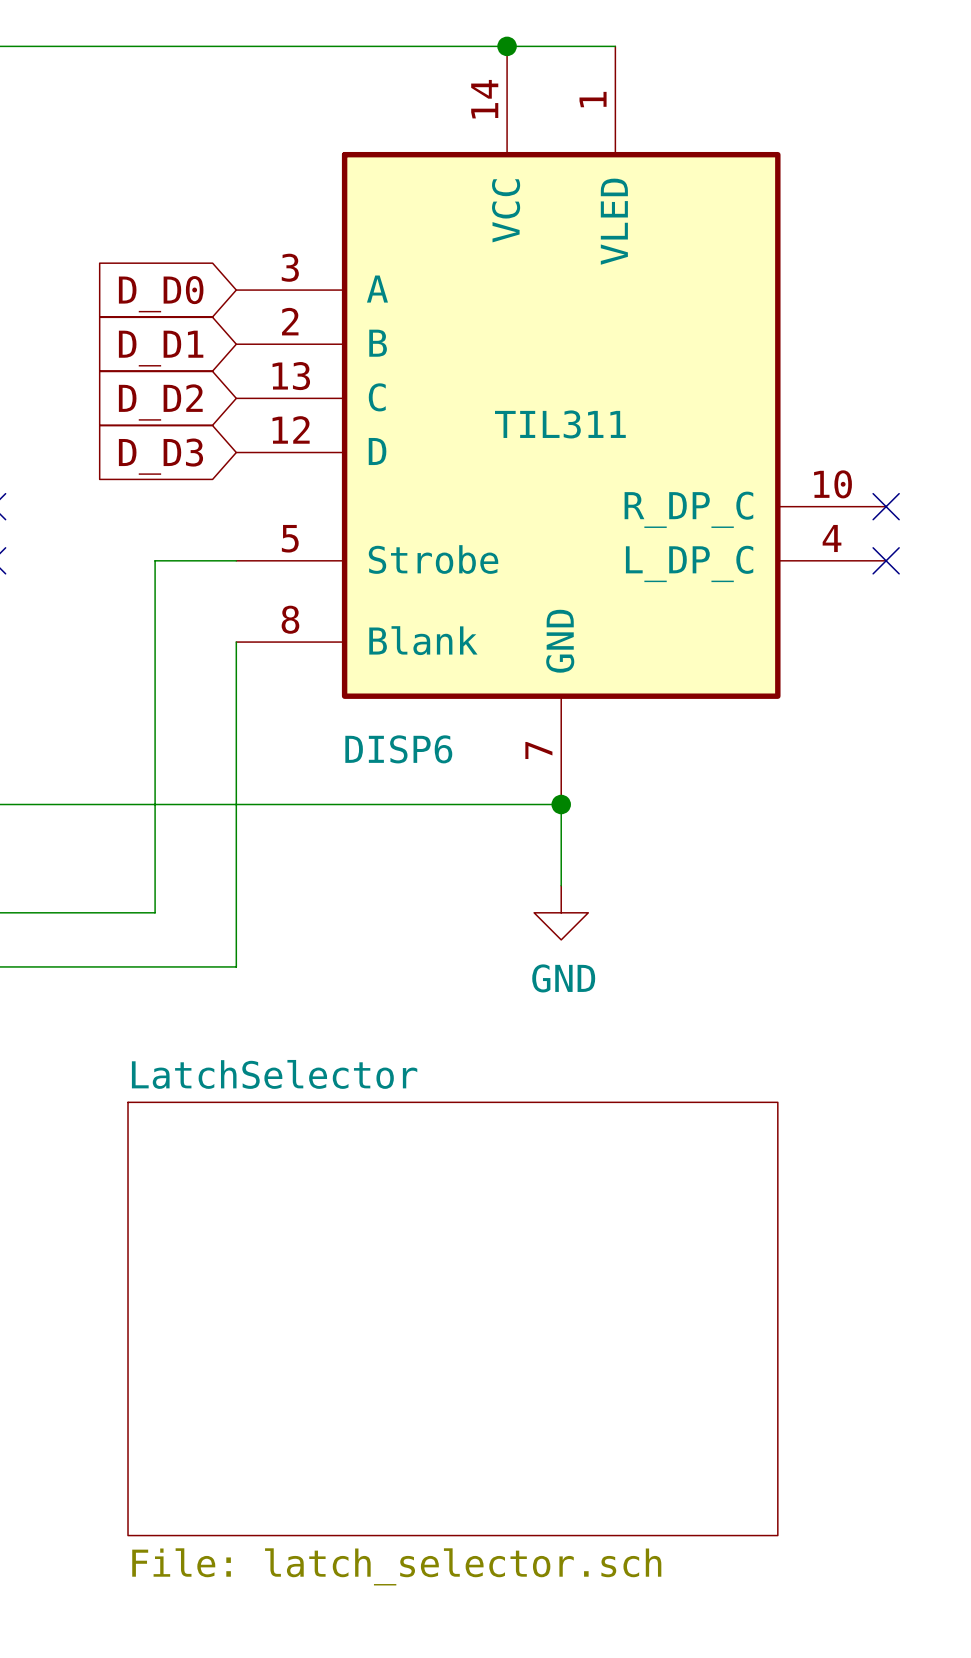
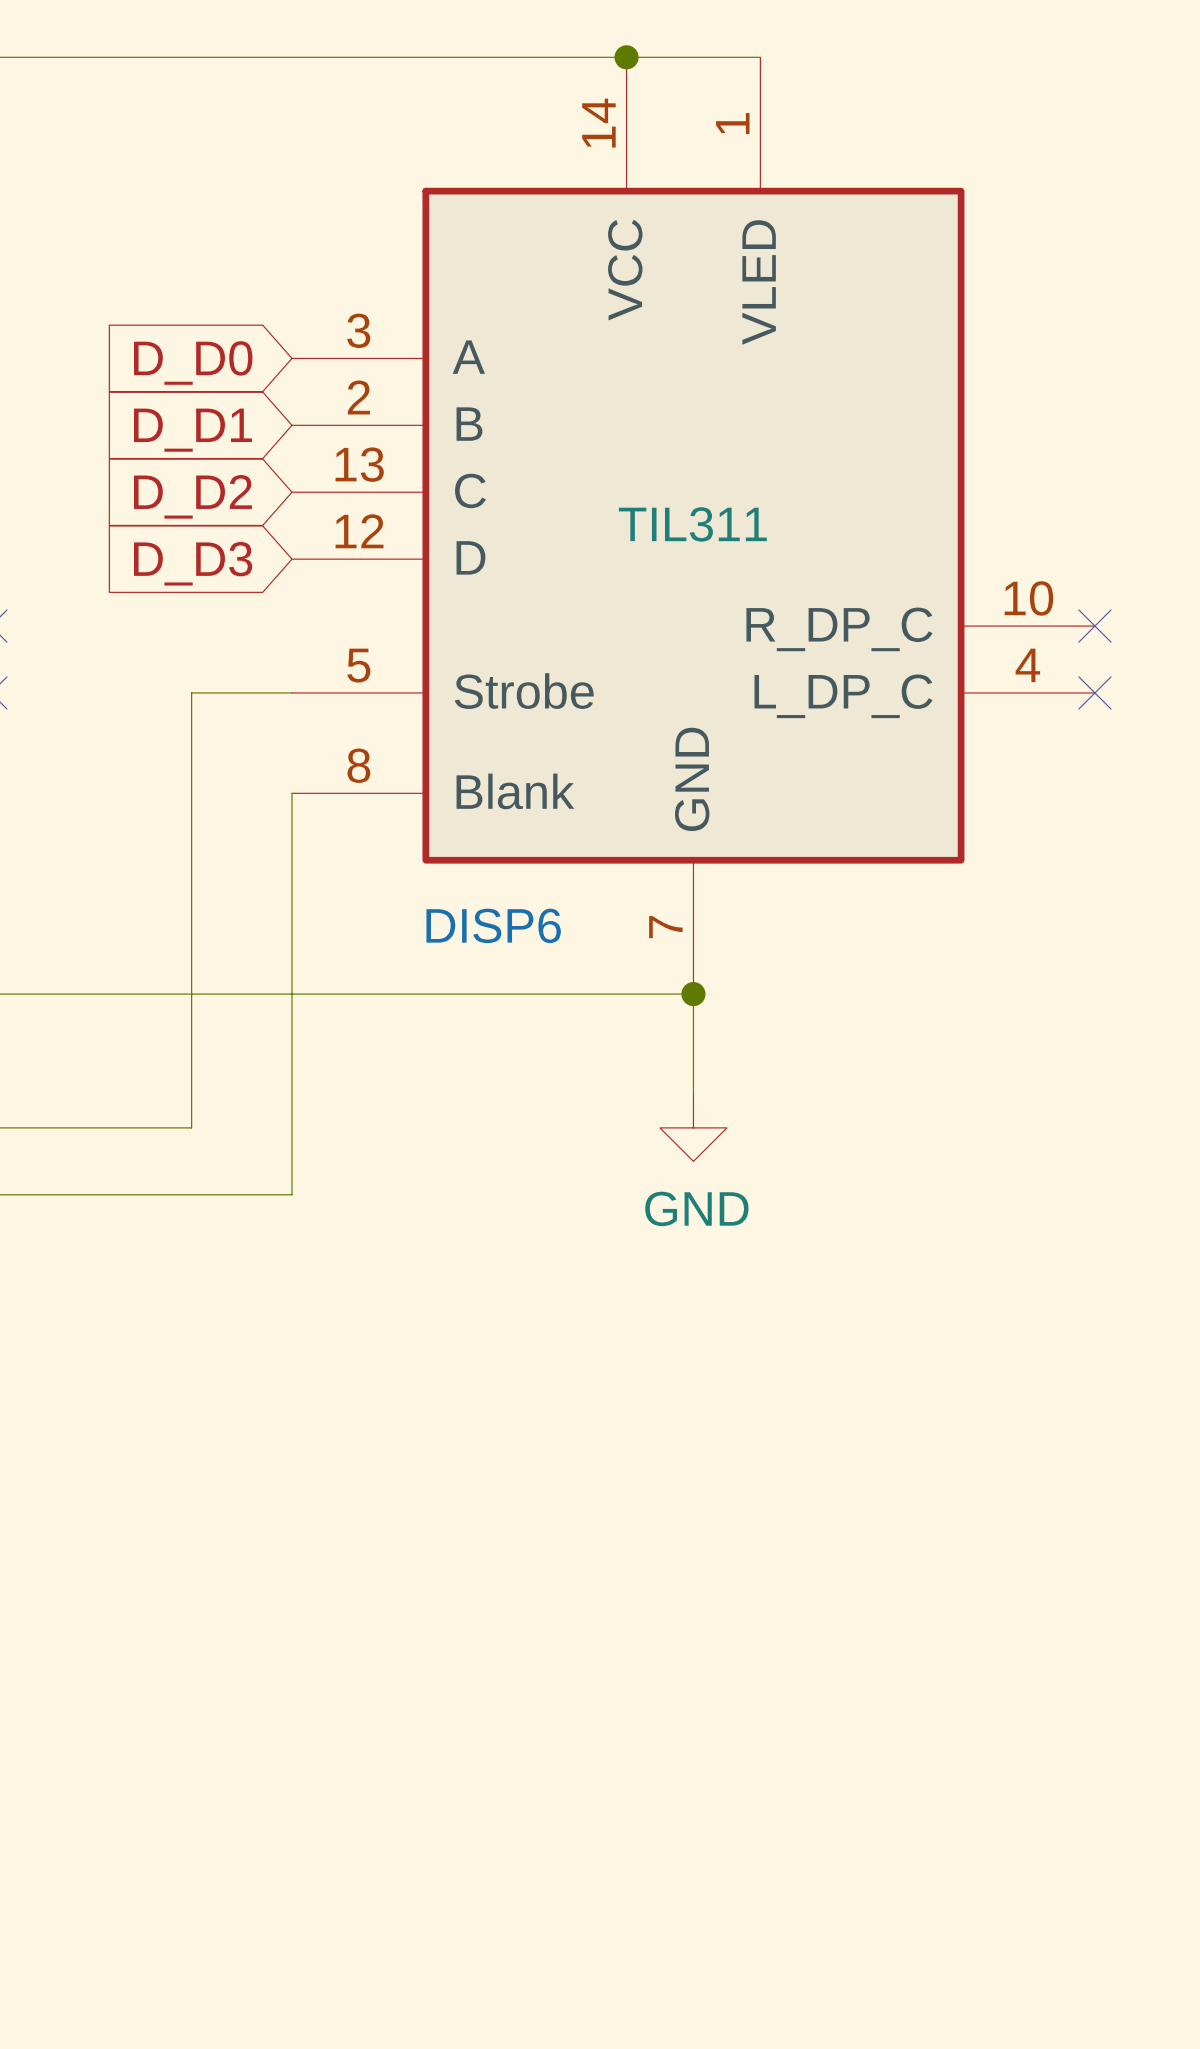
sheet LatchSelector: File: latch_selector.sch (452, 1318) -> none

